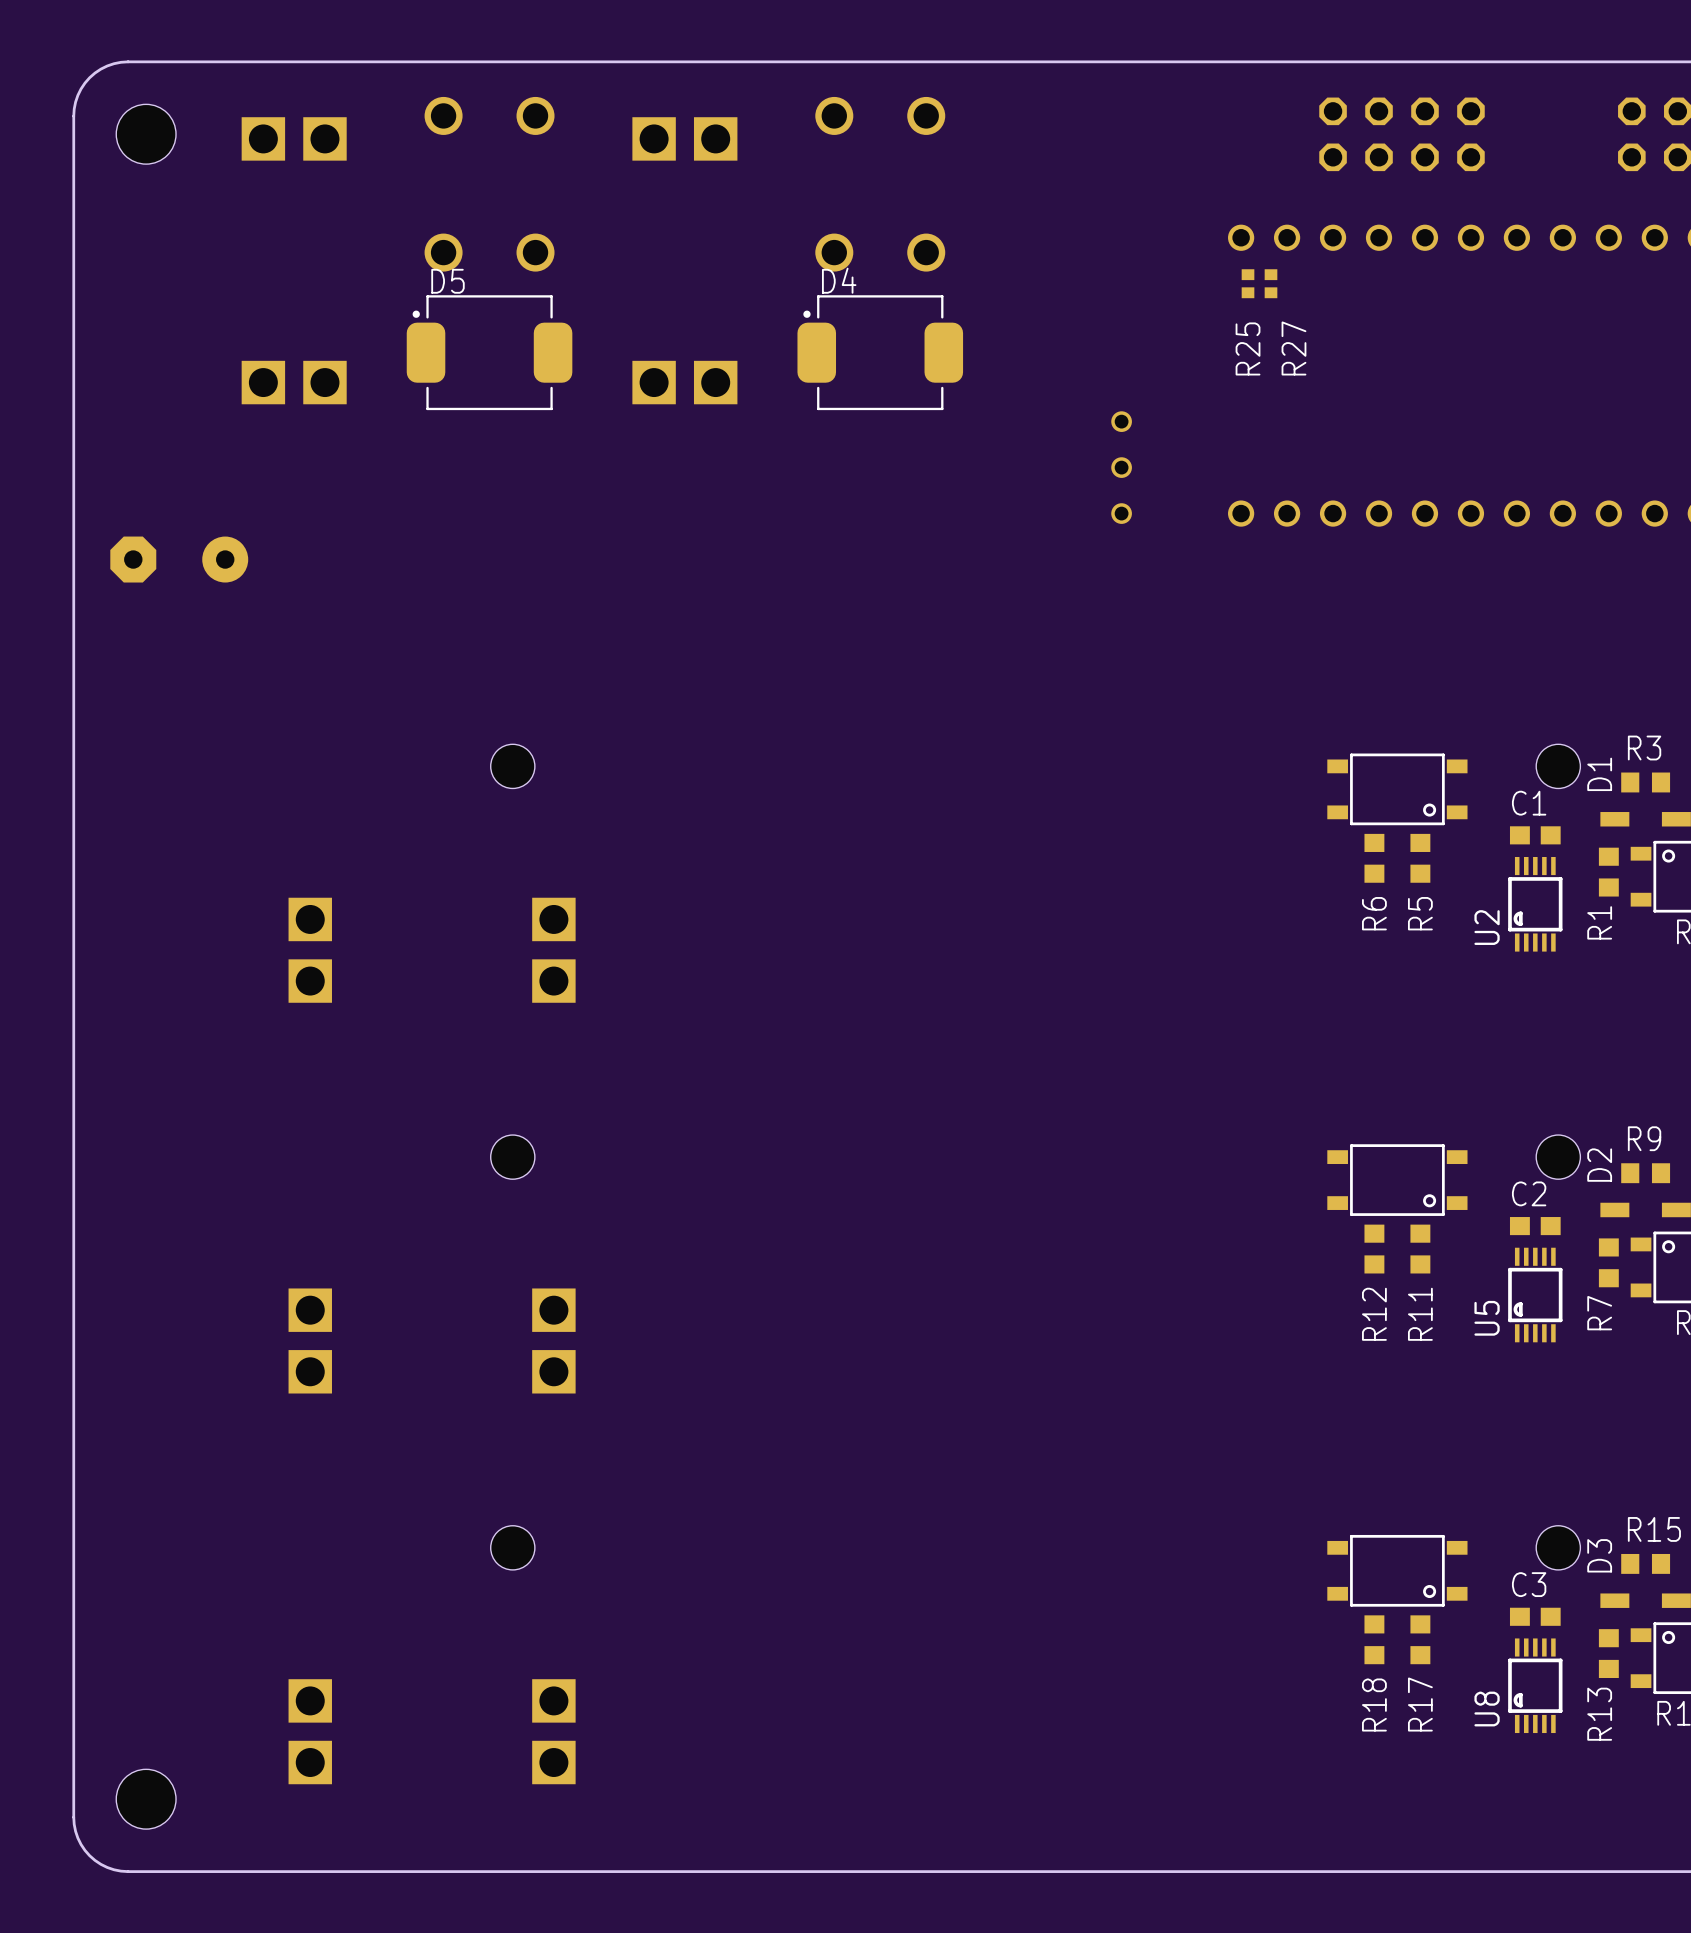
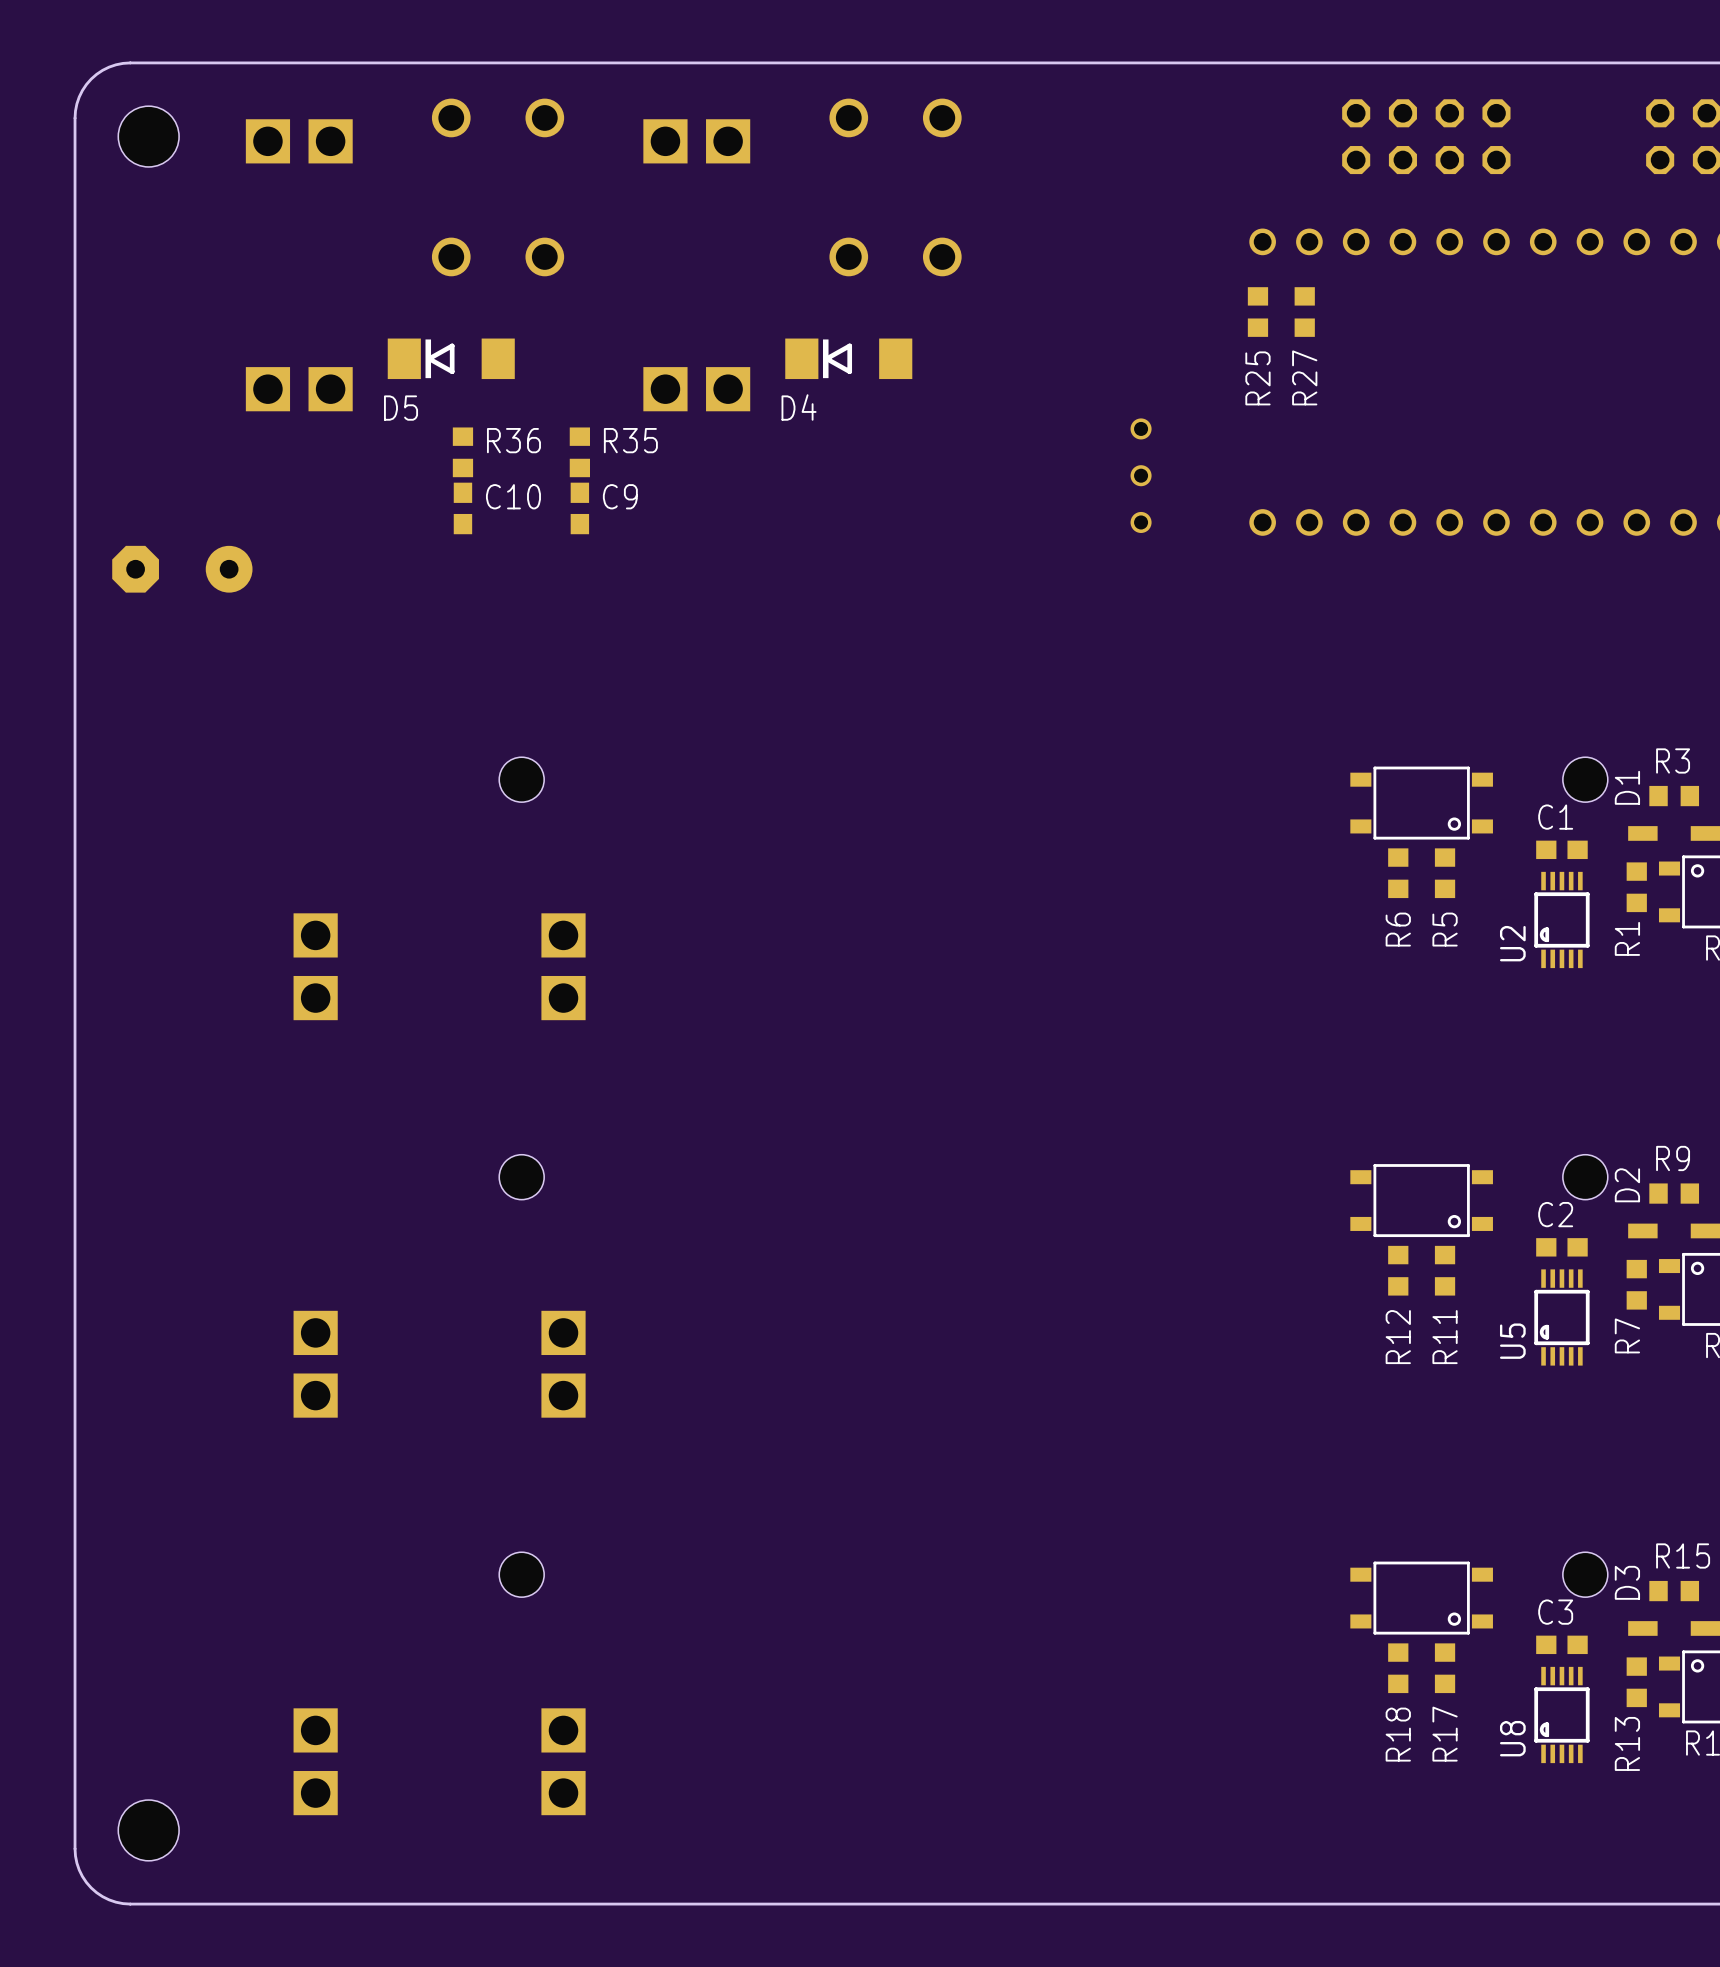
R25 footprint: [1241, 269, 1255, 299] -> [1247, 287, 1269, 337]
R27 footprint: [1264, 269, 1278, 299] -> [1294, 287, 1315, 337]
D4 name position: D4 (839, 280) -> D4 (799, 407)
D5 name position: D5 (447, 281) -> D5 (401, 408)
D5 footprint: [406, 295, 573, 411] -> [387, 338, 515, 380]
D4 footprint: [797, 295, 964, 411] -> [785, 338, 913, 380]
R36: none -> (462, 452)
R35: none -> (579, 452)
C10: none -> (462, 508)
C9: none -> (579, 508)

